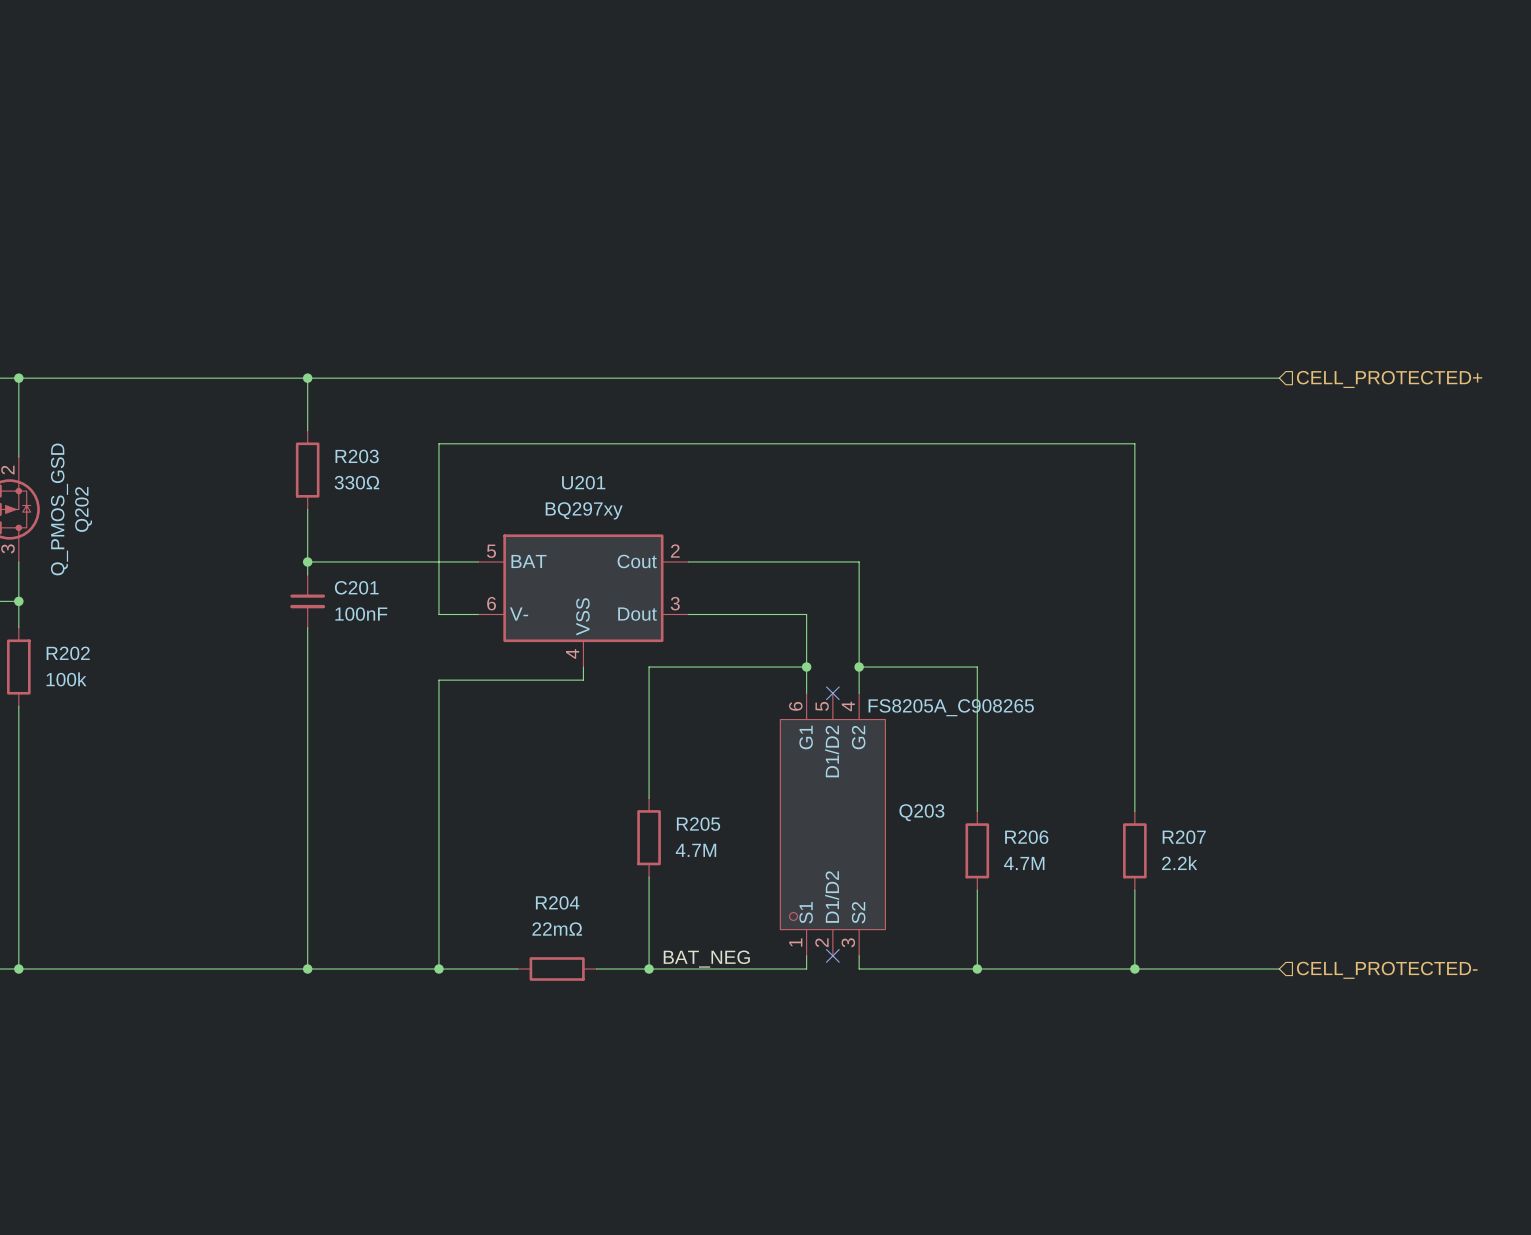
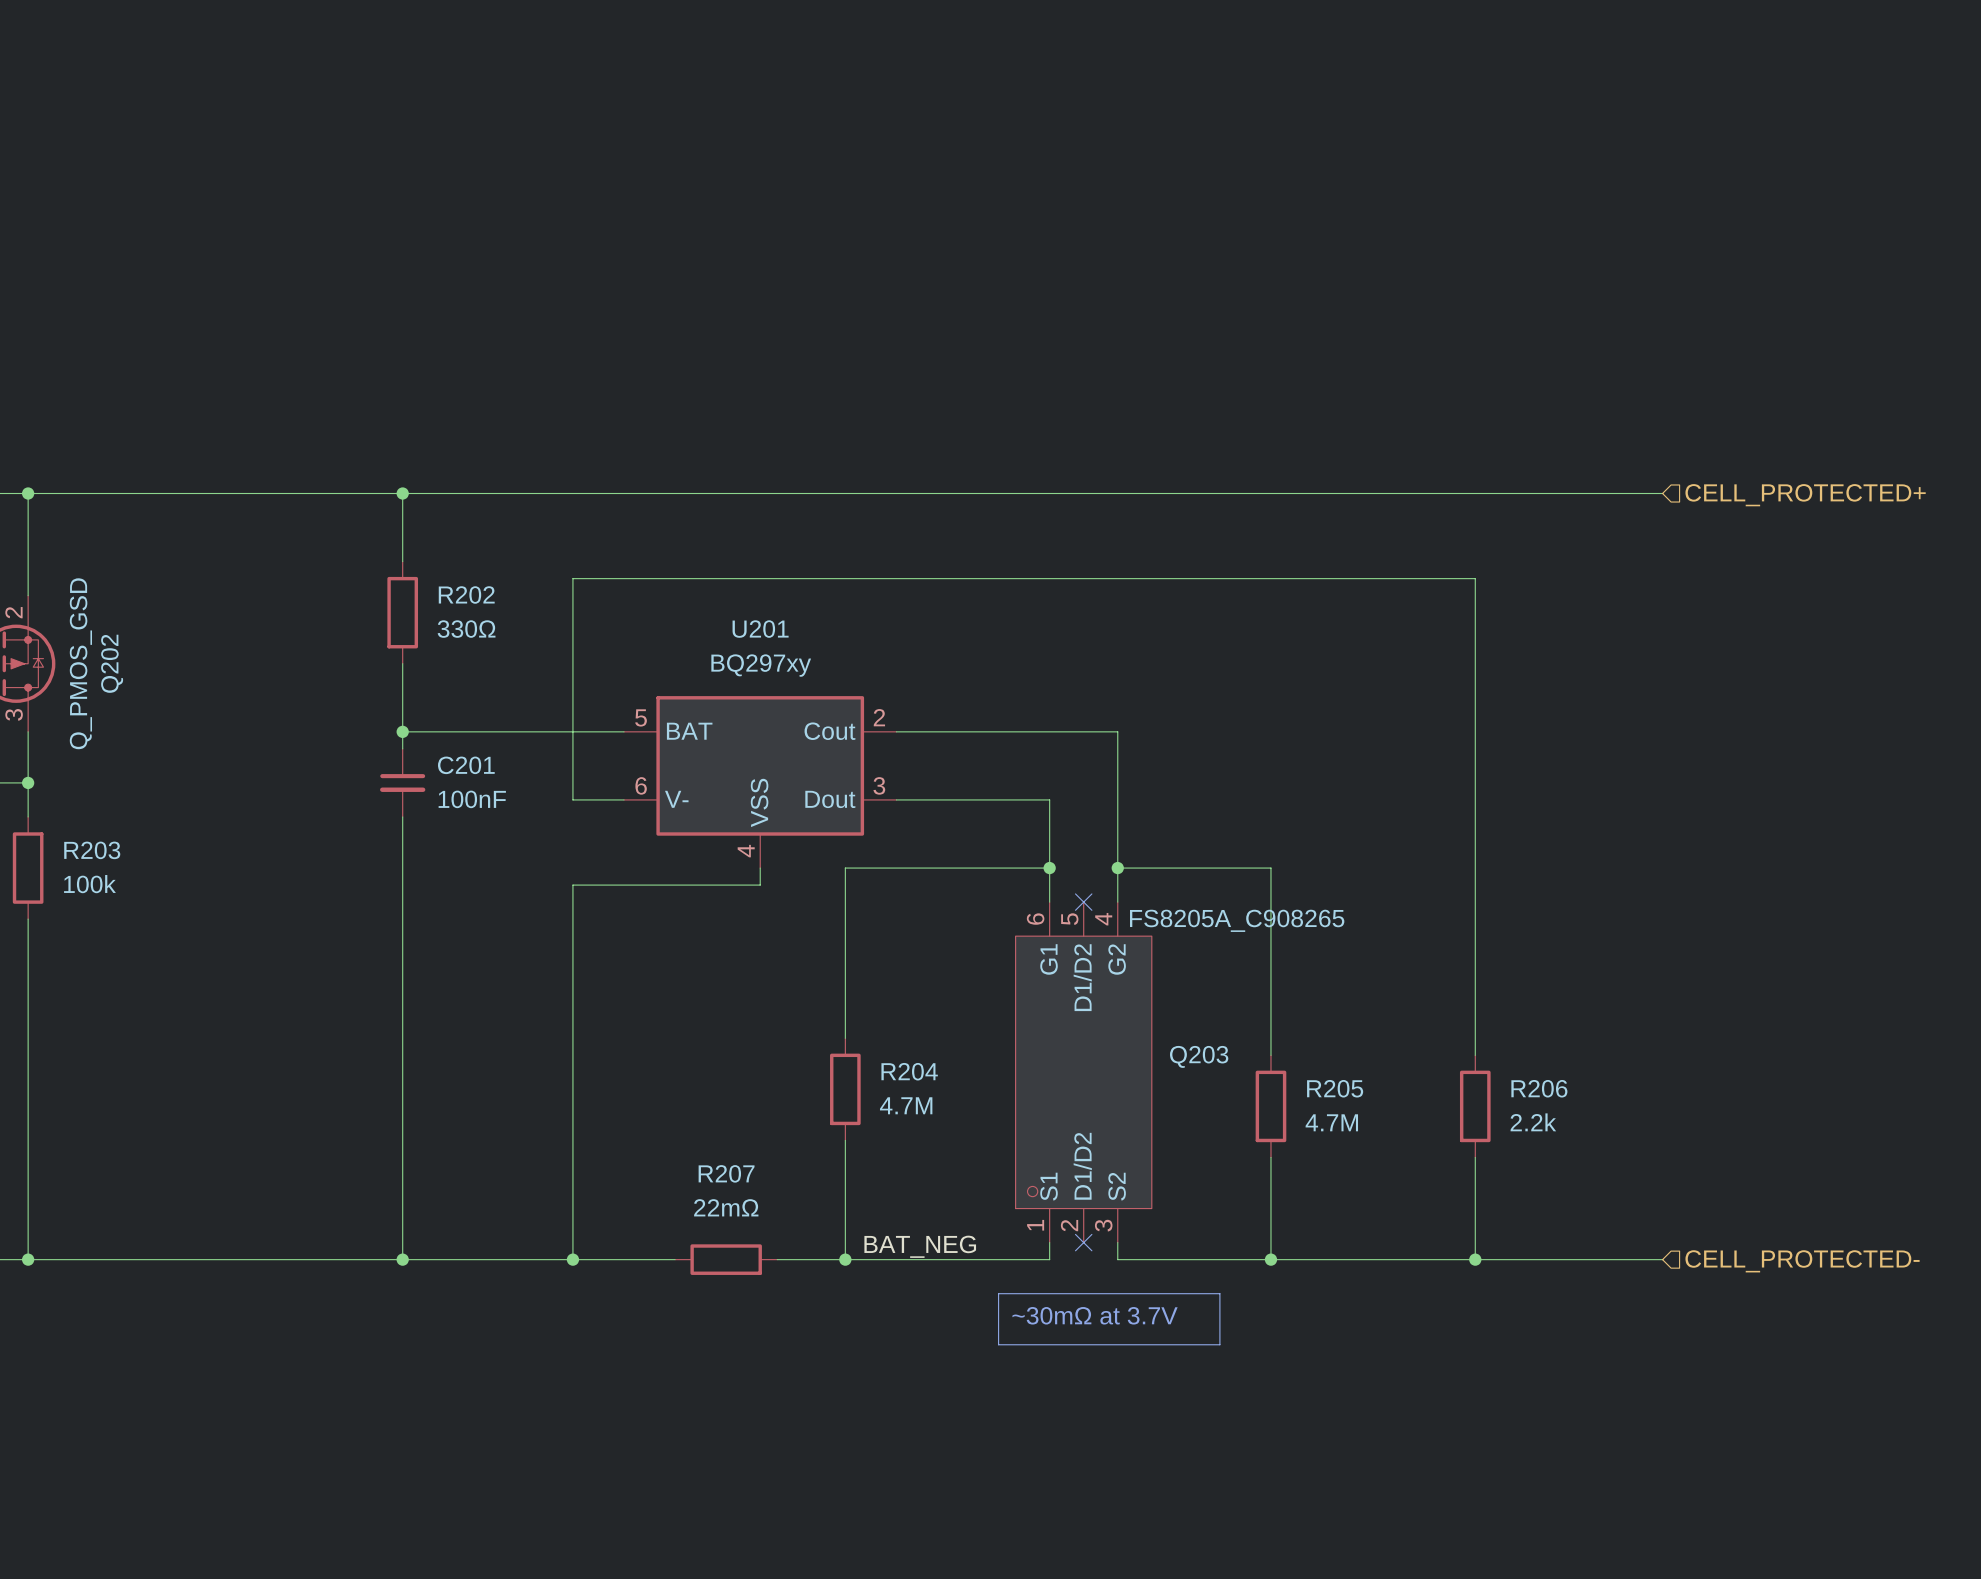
R203 name: R203 (357, 456) -> R202 (466, 595)
R202 name: R202 (68, 653) -> R203 (92, 850)
R205 name: R205 (698, 824) -> R204 (909, 1071)
R206 name: R206 (1026, 837) -> R205 (1335, 1088)
R207 name: R207 (1184, 837) -> R206 (1539, 1088)
R204 name: R204 (557, 902) -> R207 (726, 1173)
line: none -> (998, 1293) (1219, 1293) (1219, 1344) (998, 1344) (998, 1293)
text: none -> ~30mΩ at 3.7V (1095, 1315)

